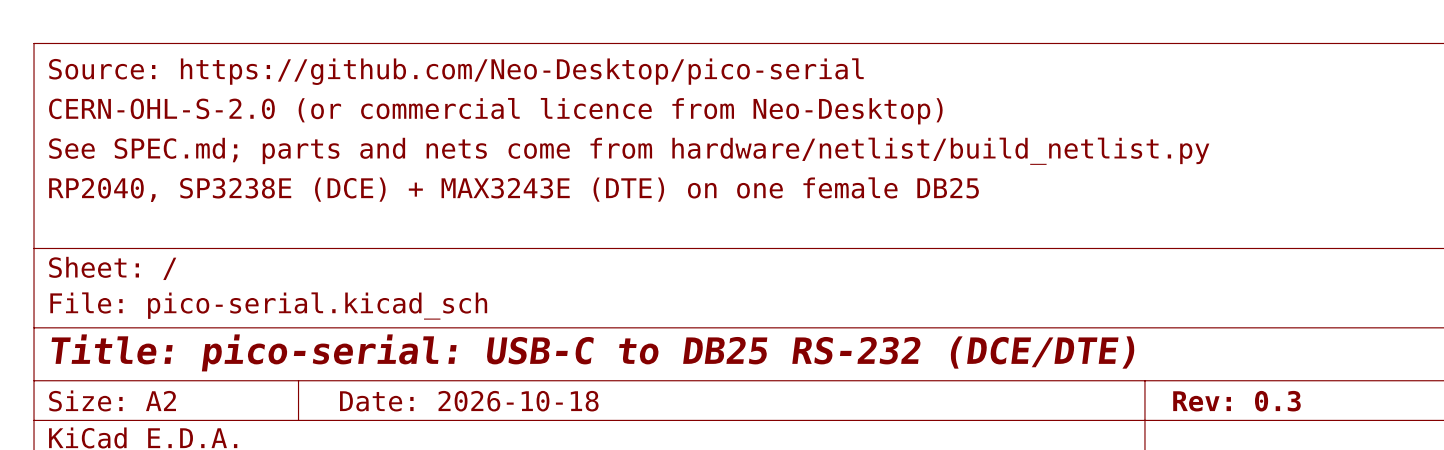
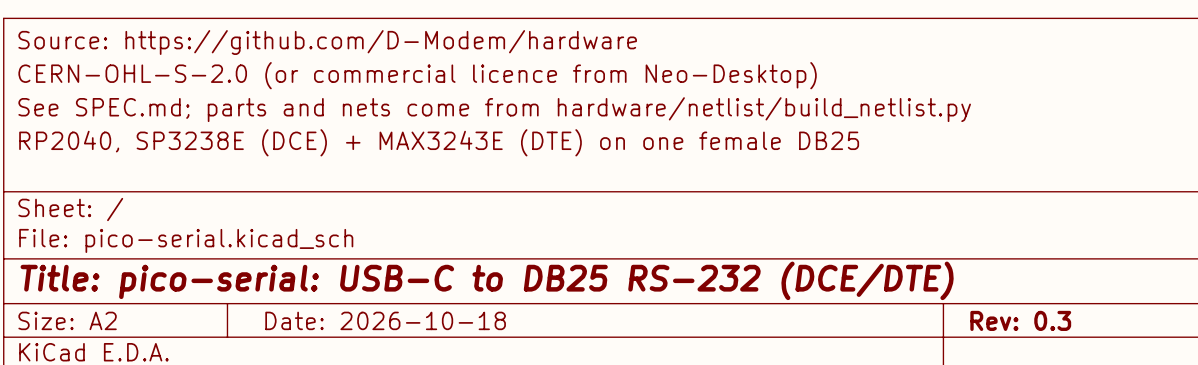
title block: Source: https://github.com/Neo-Desktop/pico-serial (456, 71) -> Source: https://github.com/D-Modem/hardware (327, 42)

